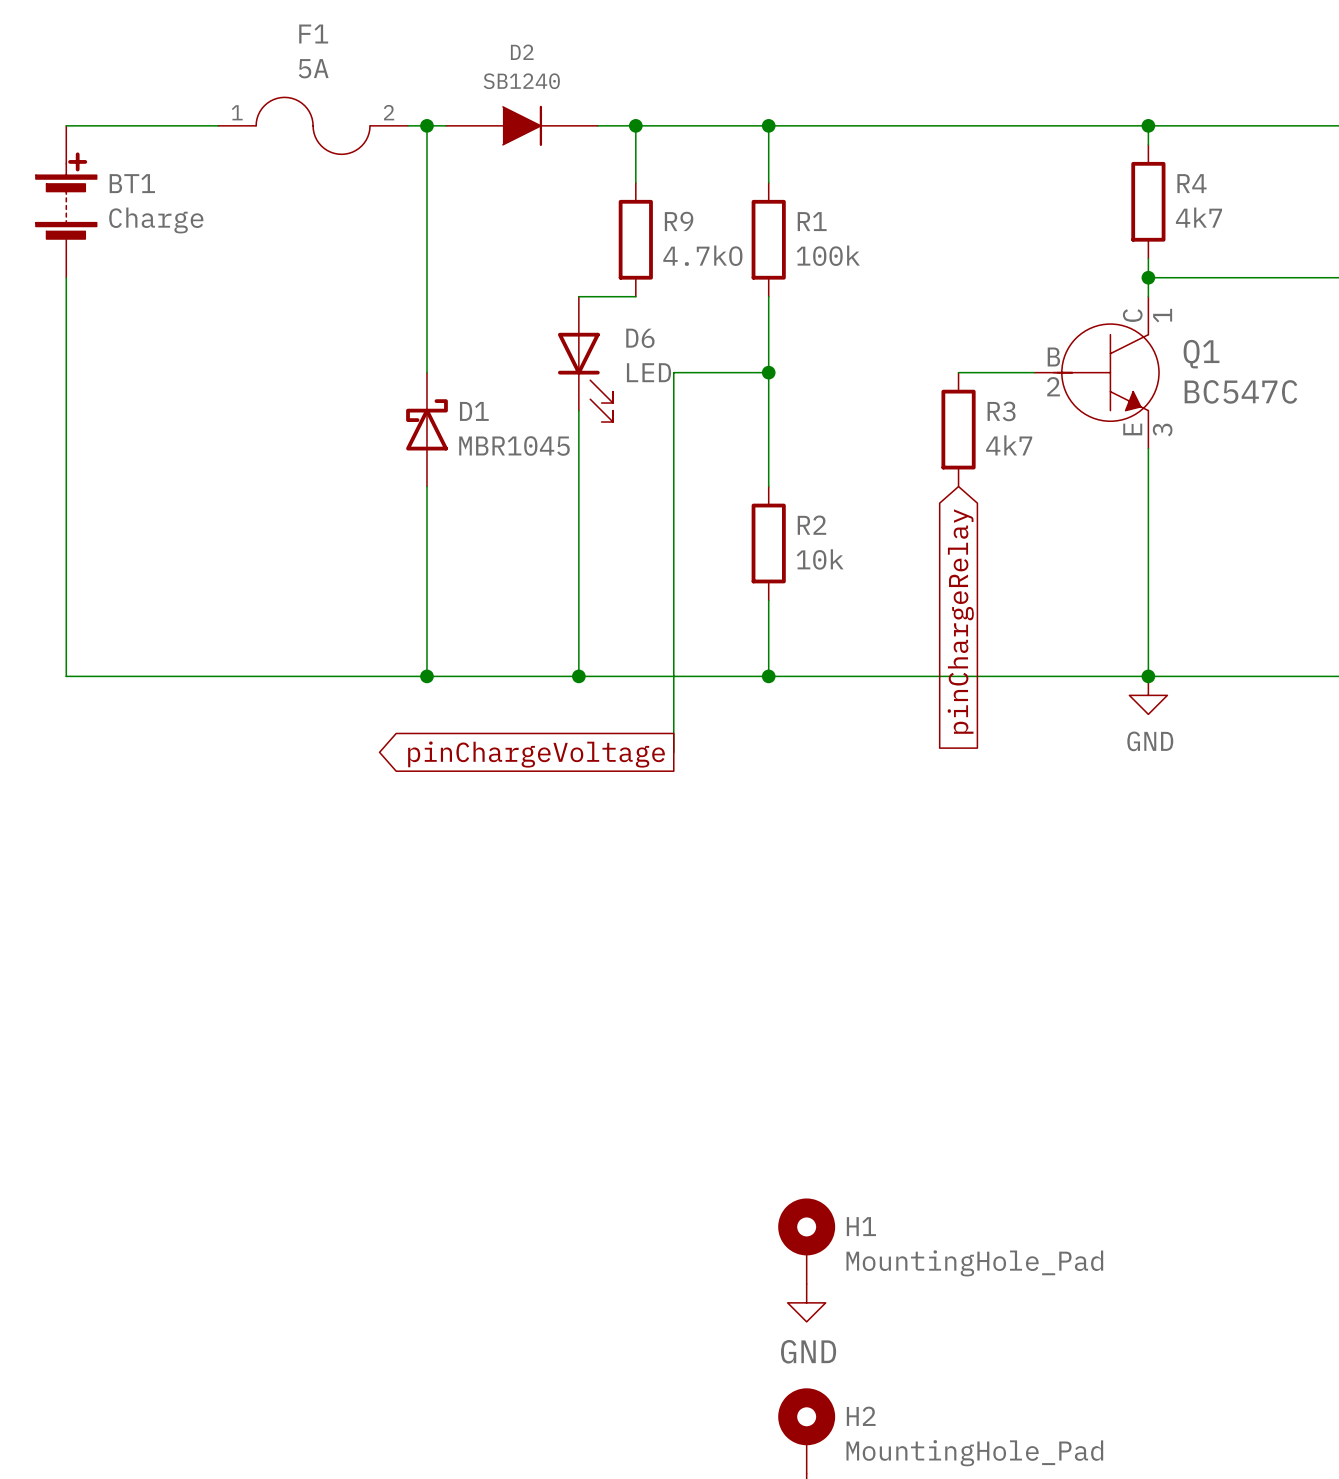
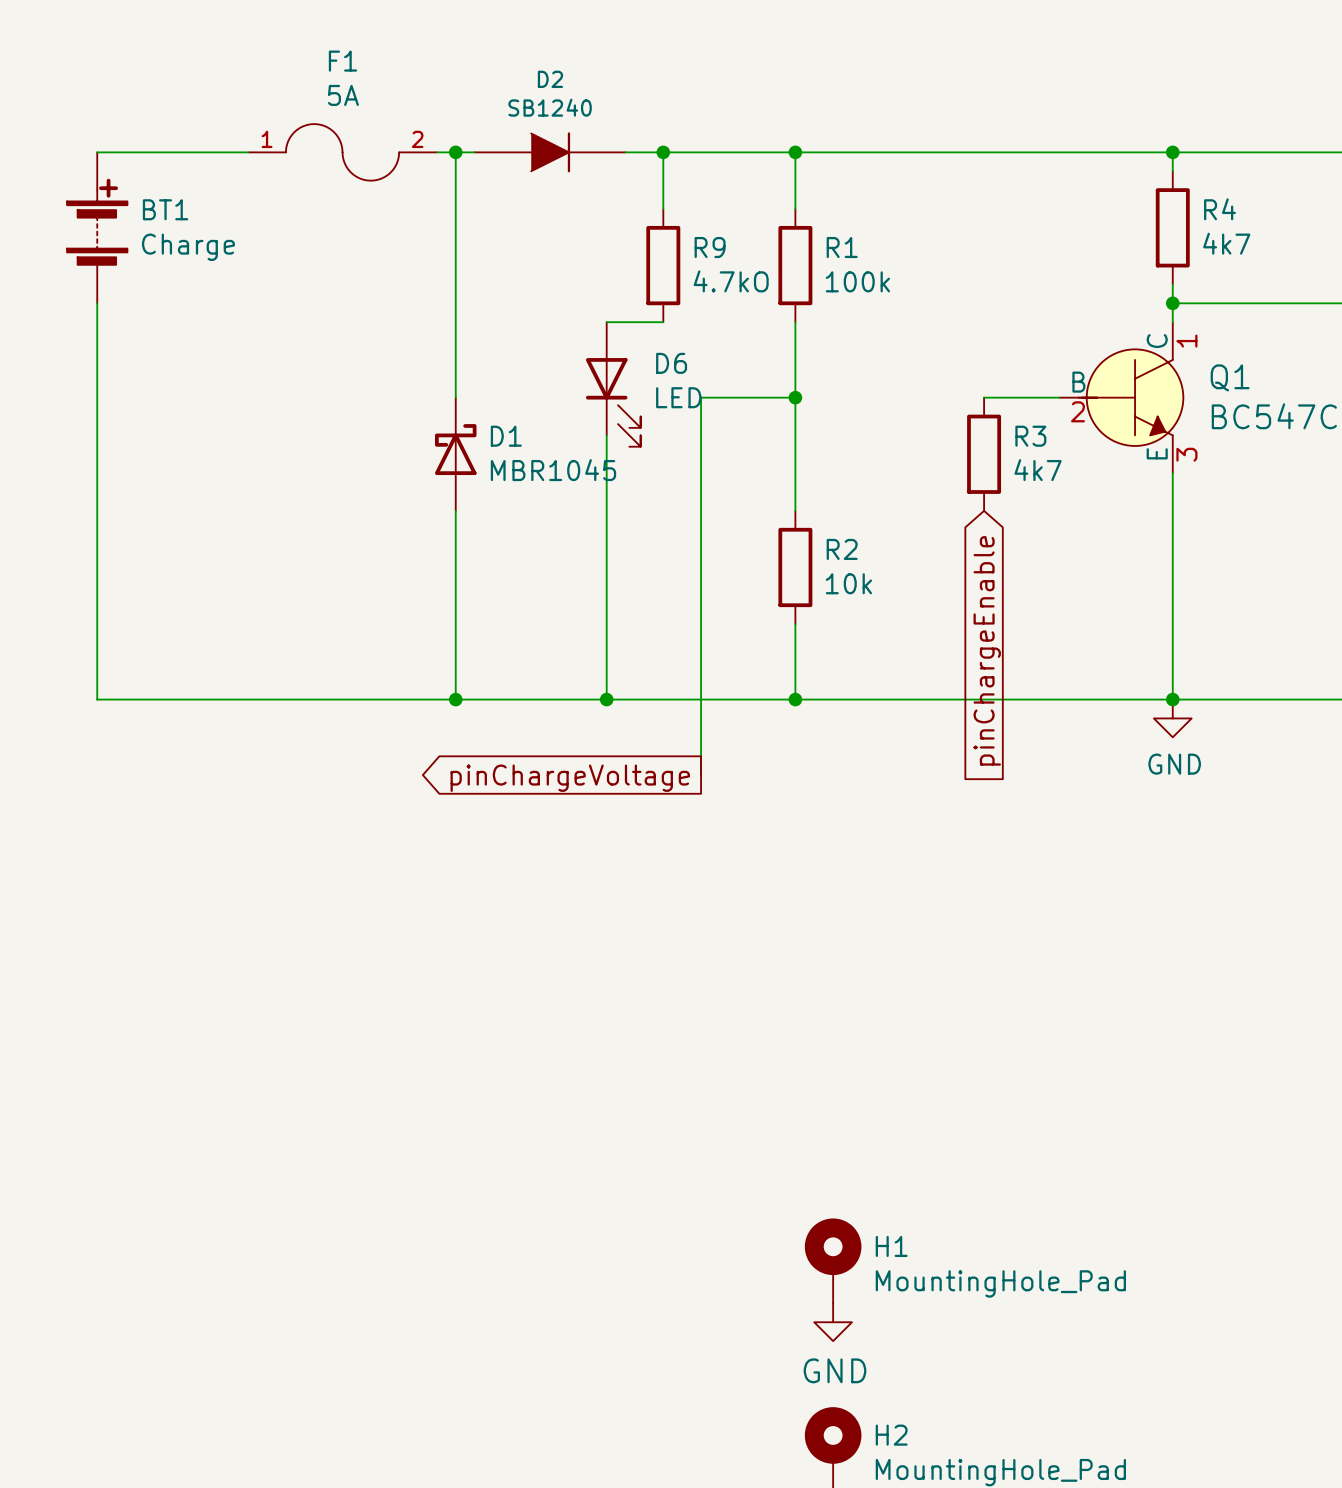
global label: pinChargeRelay (960, 621) -> pinChargeEnable (987, 650)

